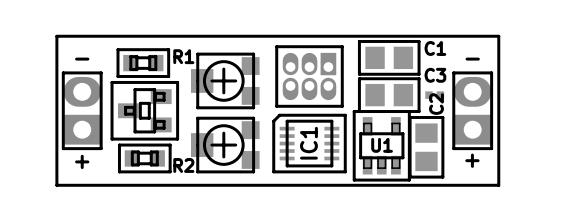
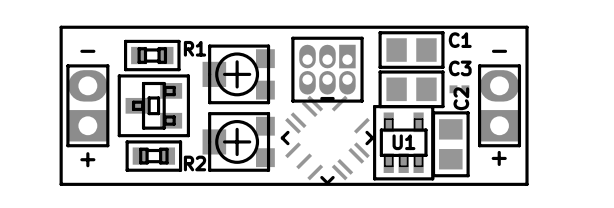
IC1: (309, 143) -> none
part: none -> (327, 140)

